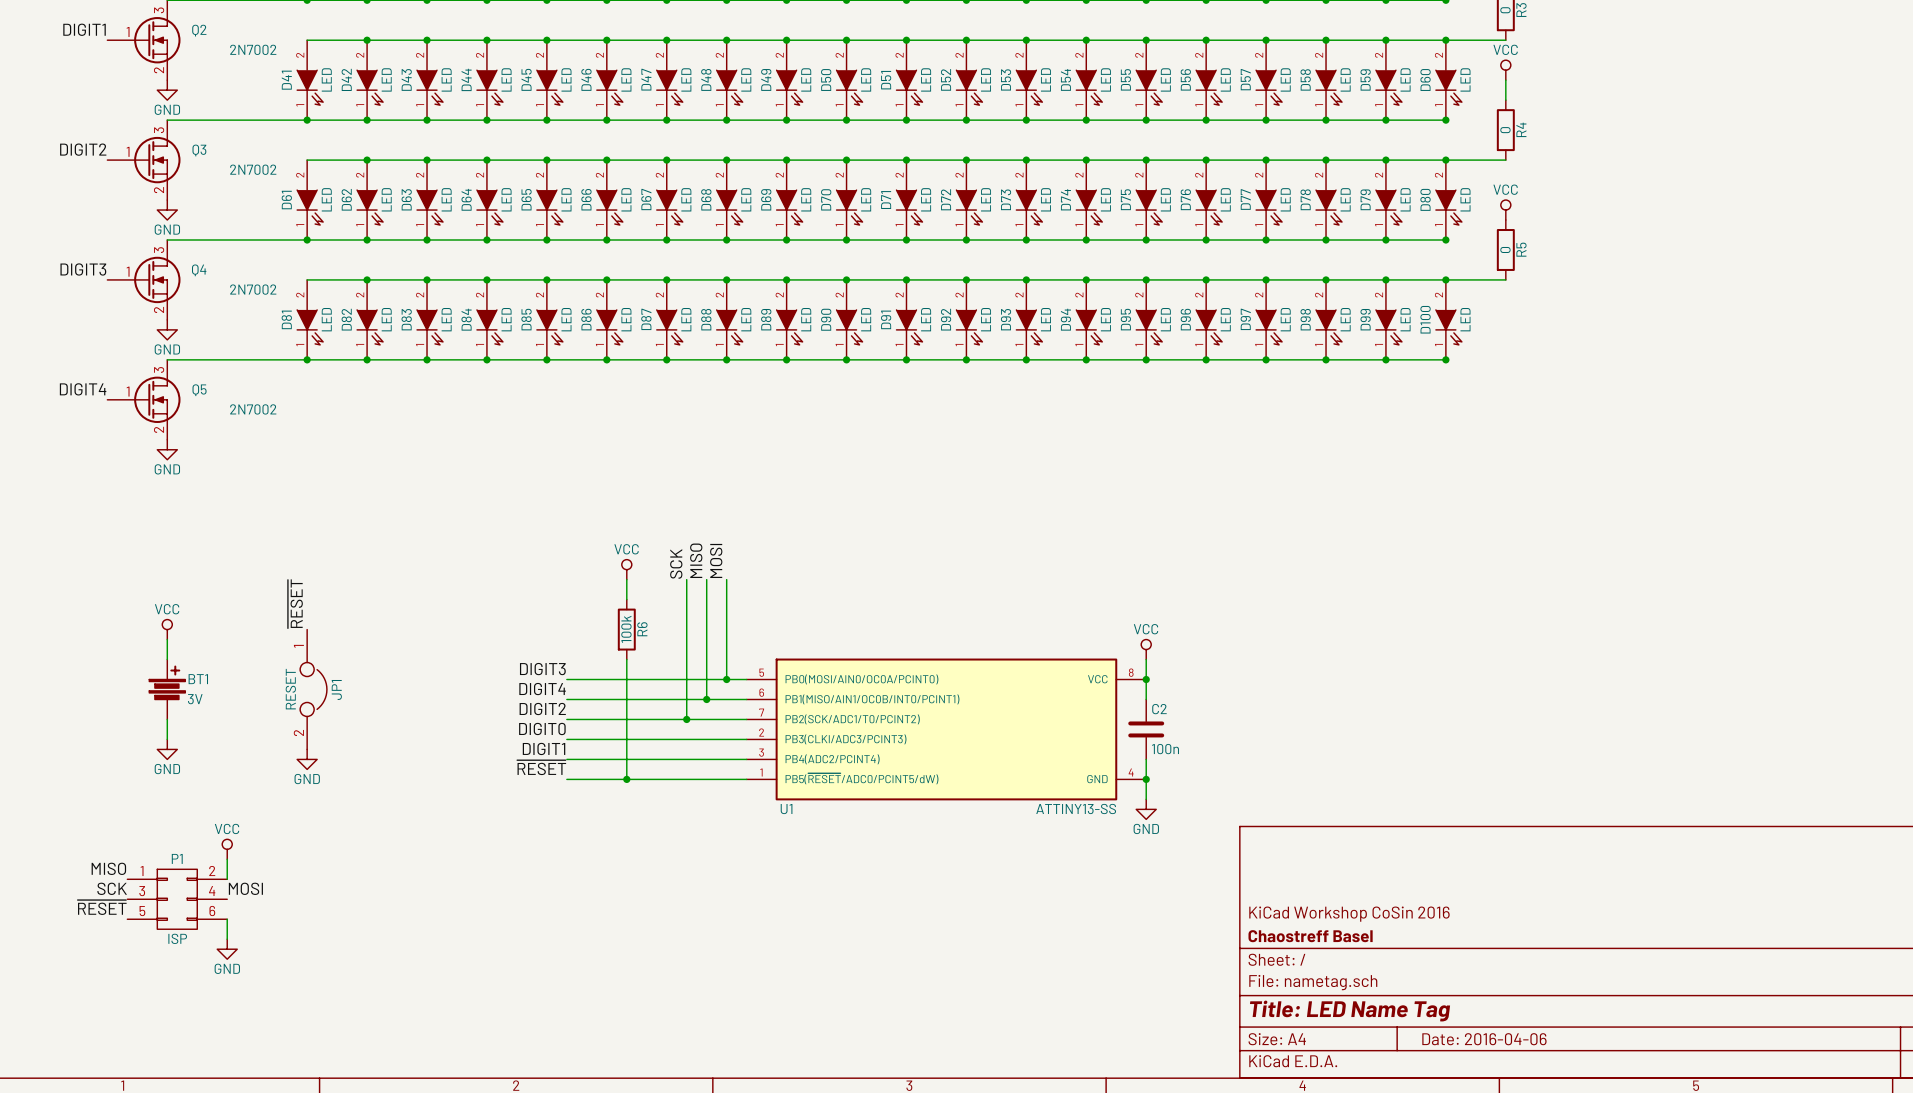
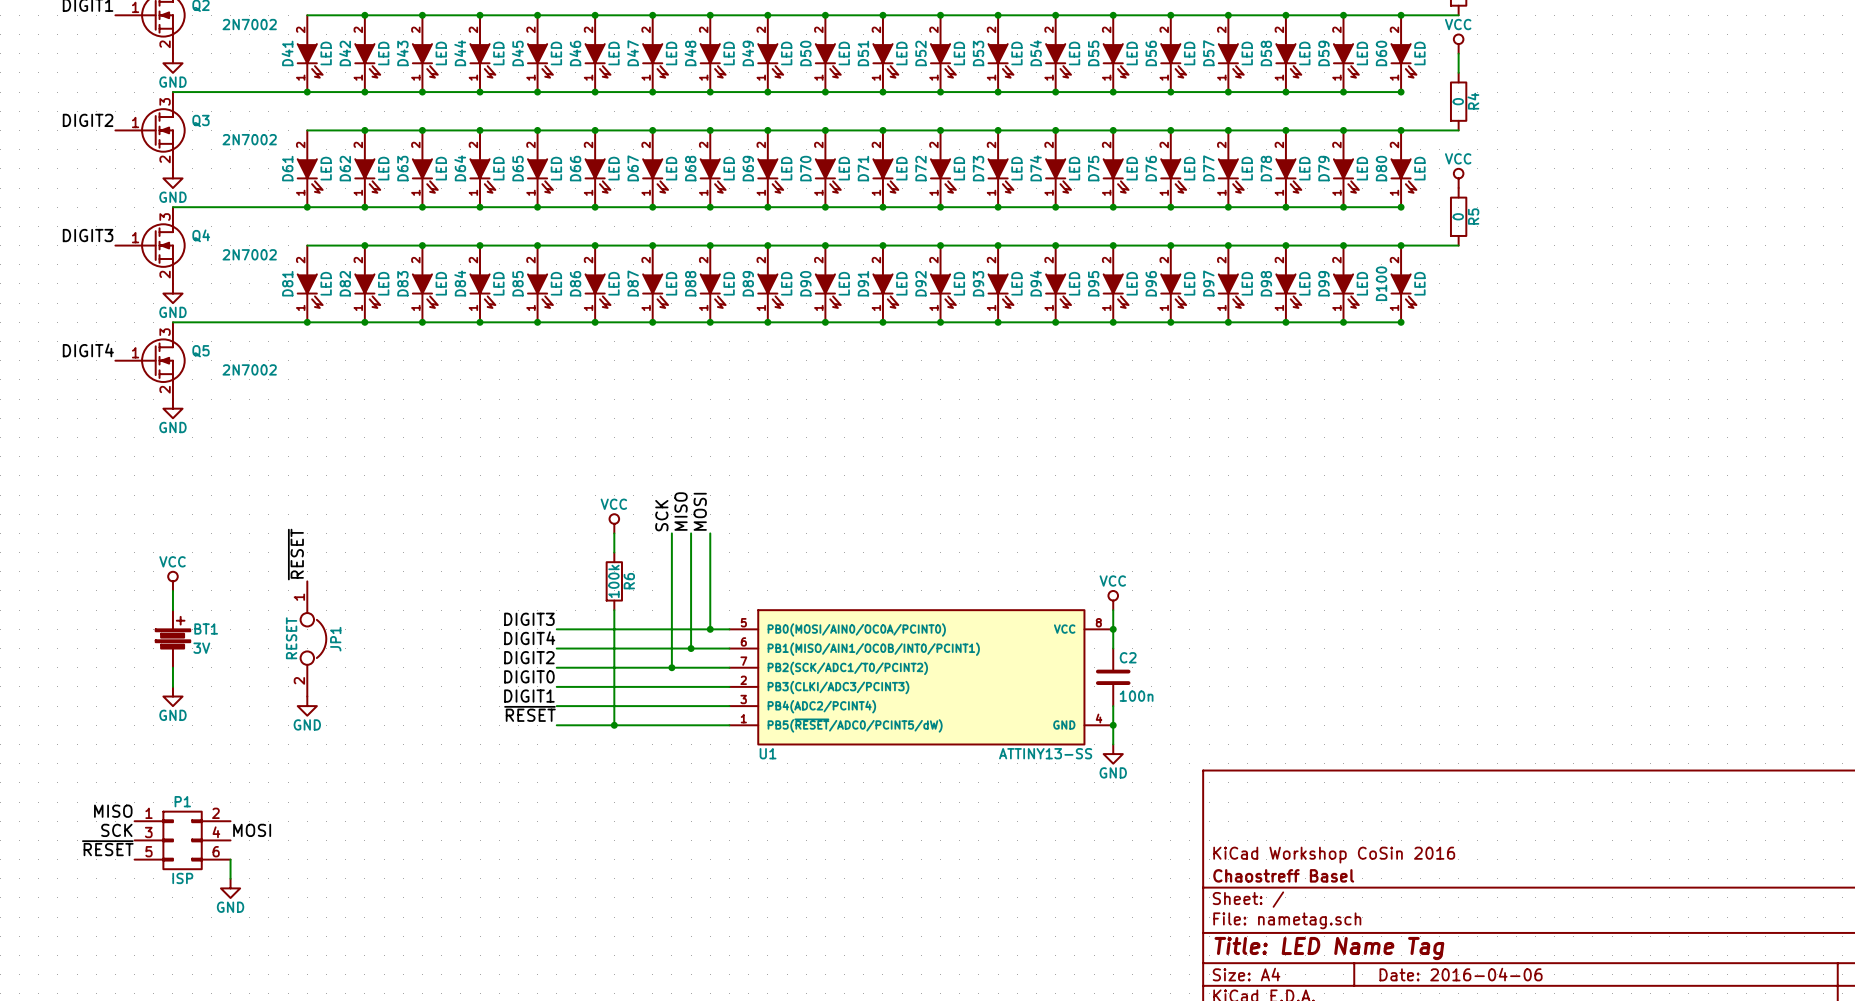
power symbol: VCC (227, 849) -> none
wire: (227, 859) (227, 879) -> none

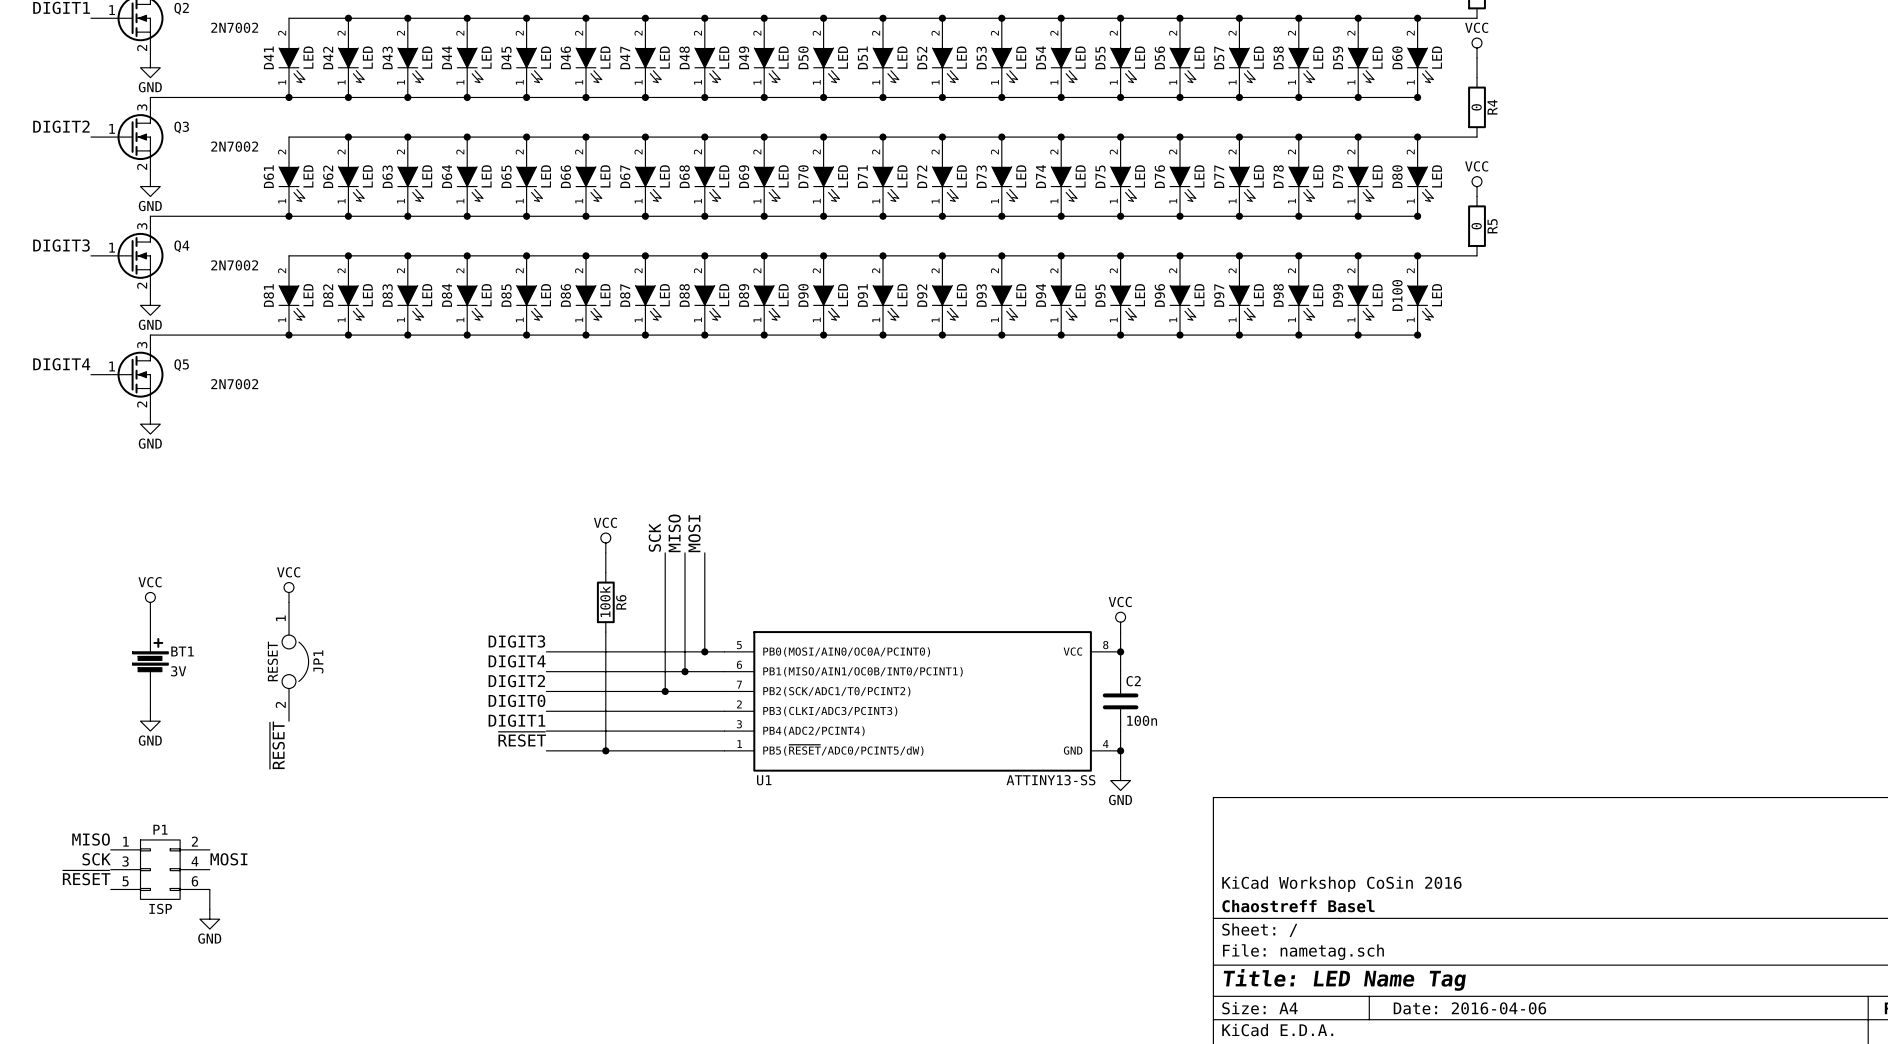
label position: ~{RESET} (295, 554) -> ~{RESET} (277, 745)
power symbol: none -> VCC (289, 592)
power symbol: GND (307, 706) -> none

